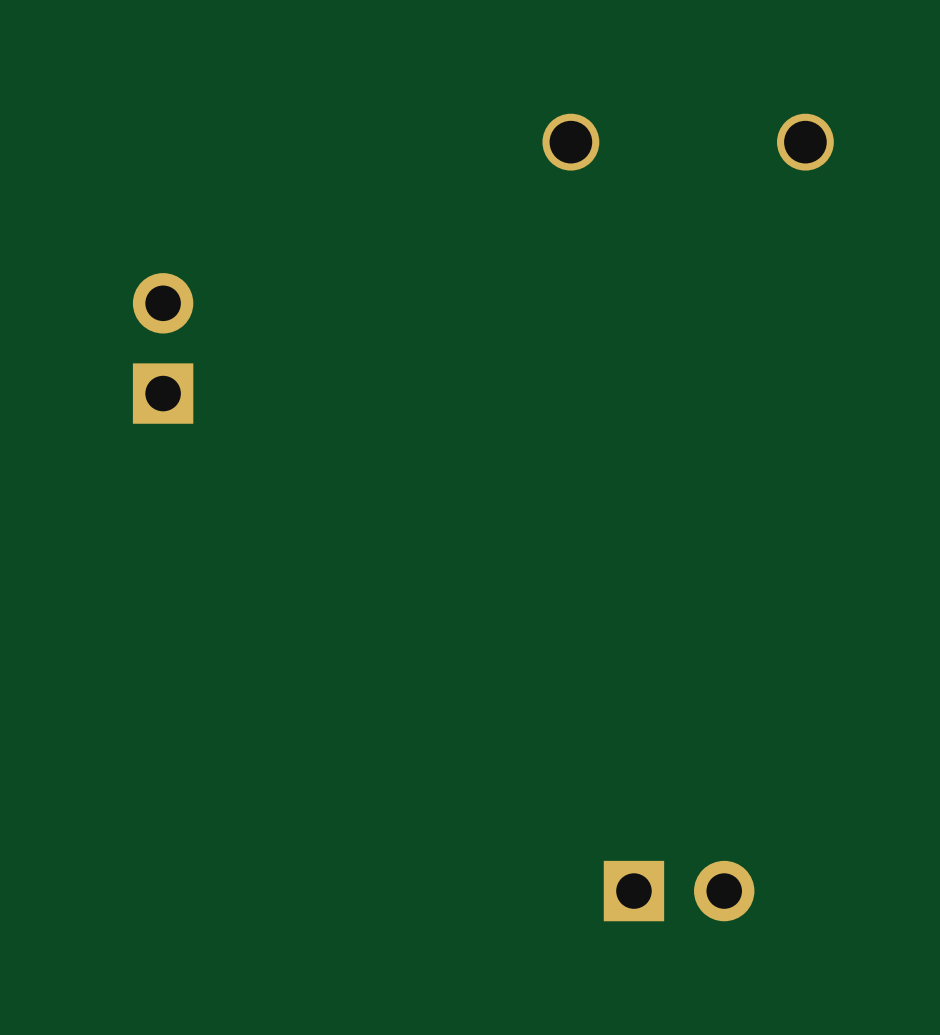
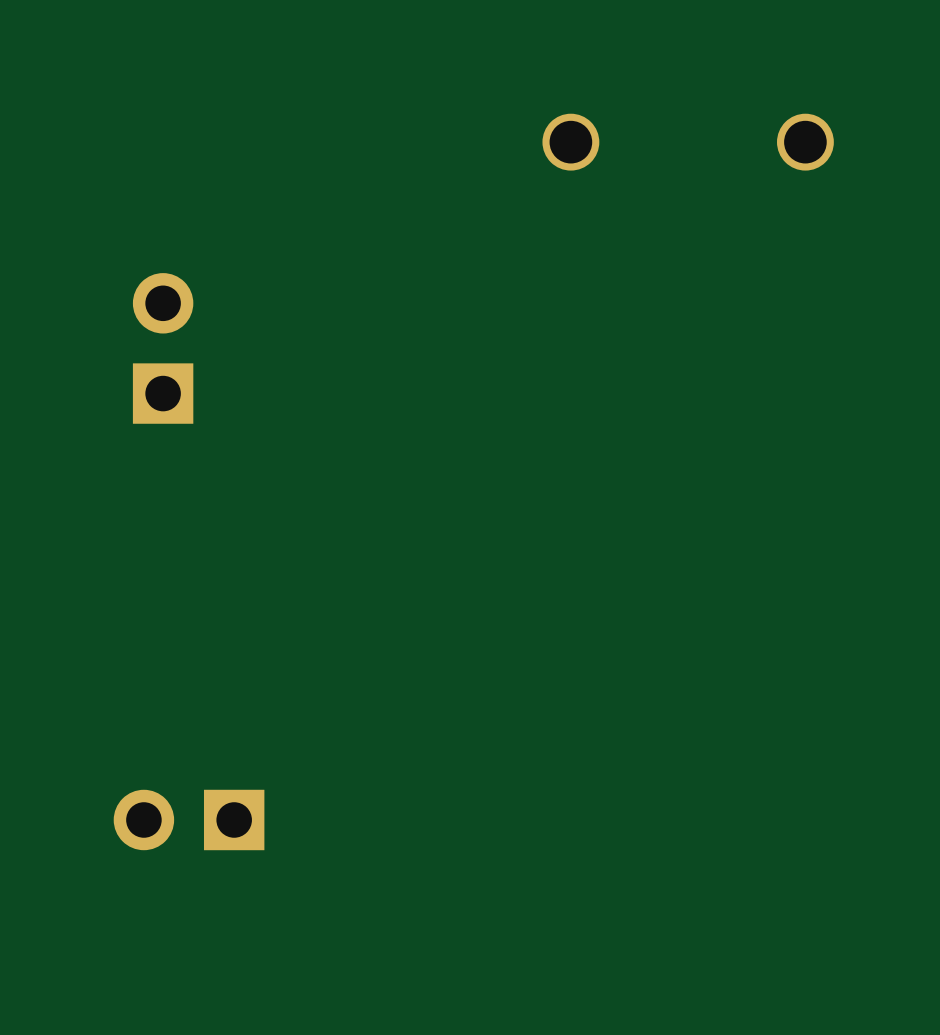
part rotation: 0° (679, 891) -> 180° (189, 819)
part position: (679, 891) -> (189, 819)

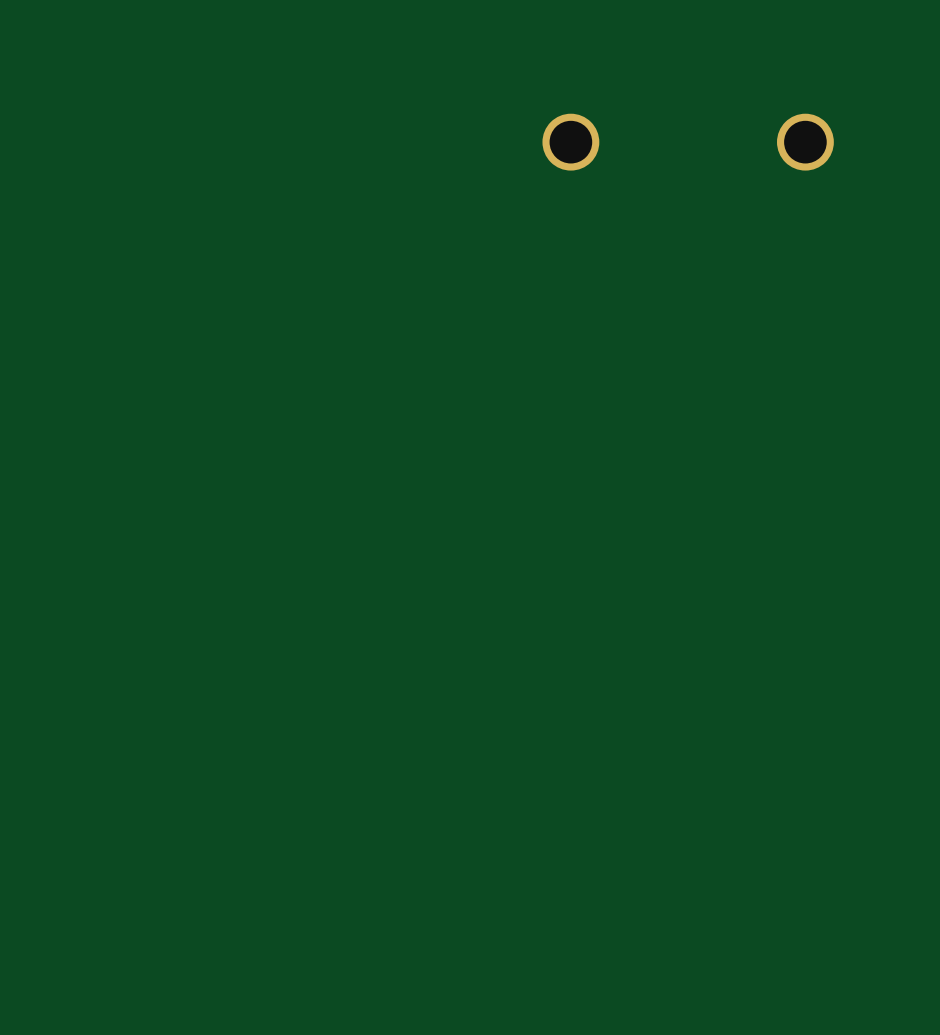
part: (163, 348) -> none
part: (189, 819) -> none

